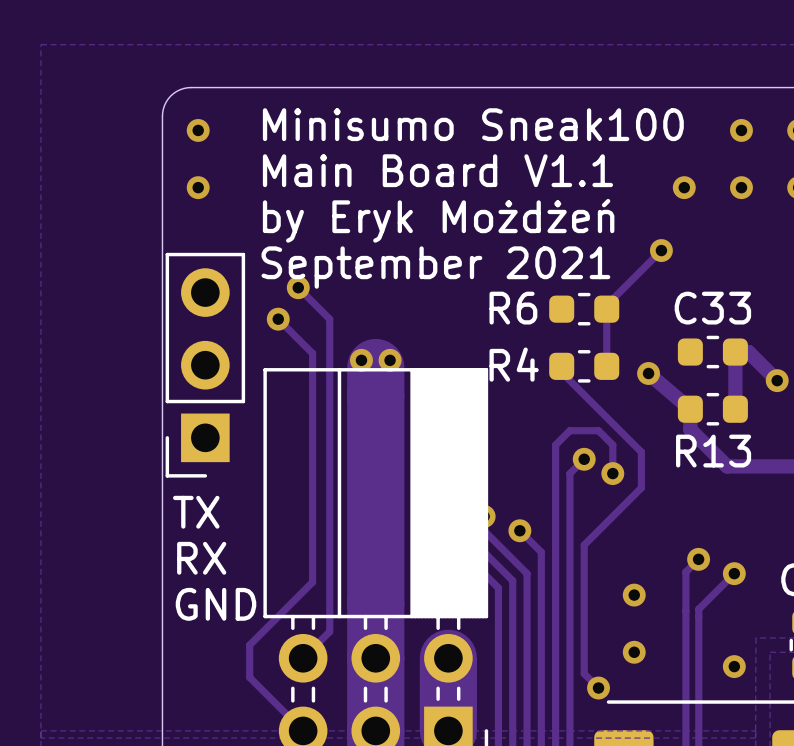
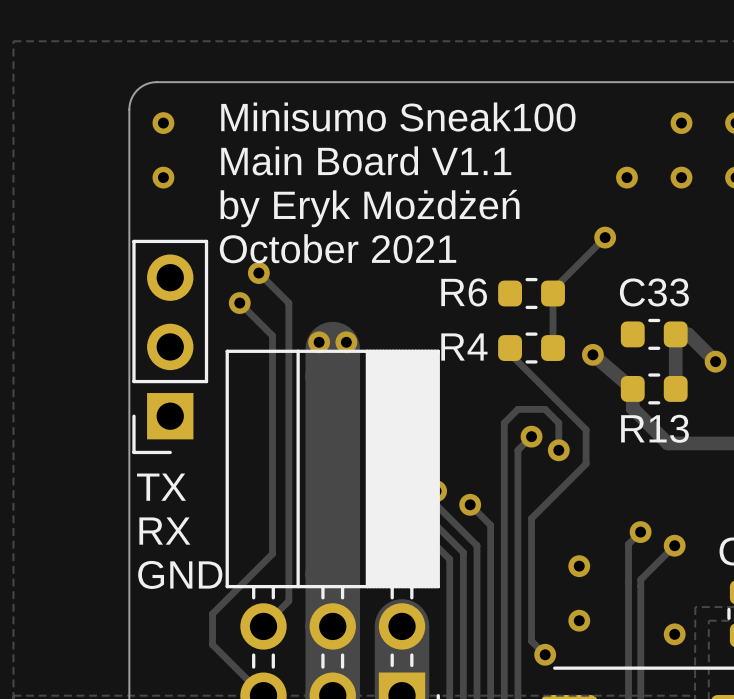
text: September 2021 (435, 267) -> October 2021 (338, 248)

